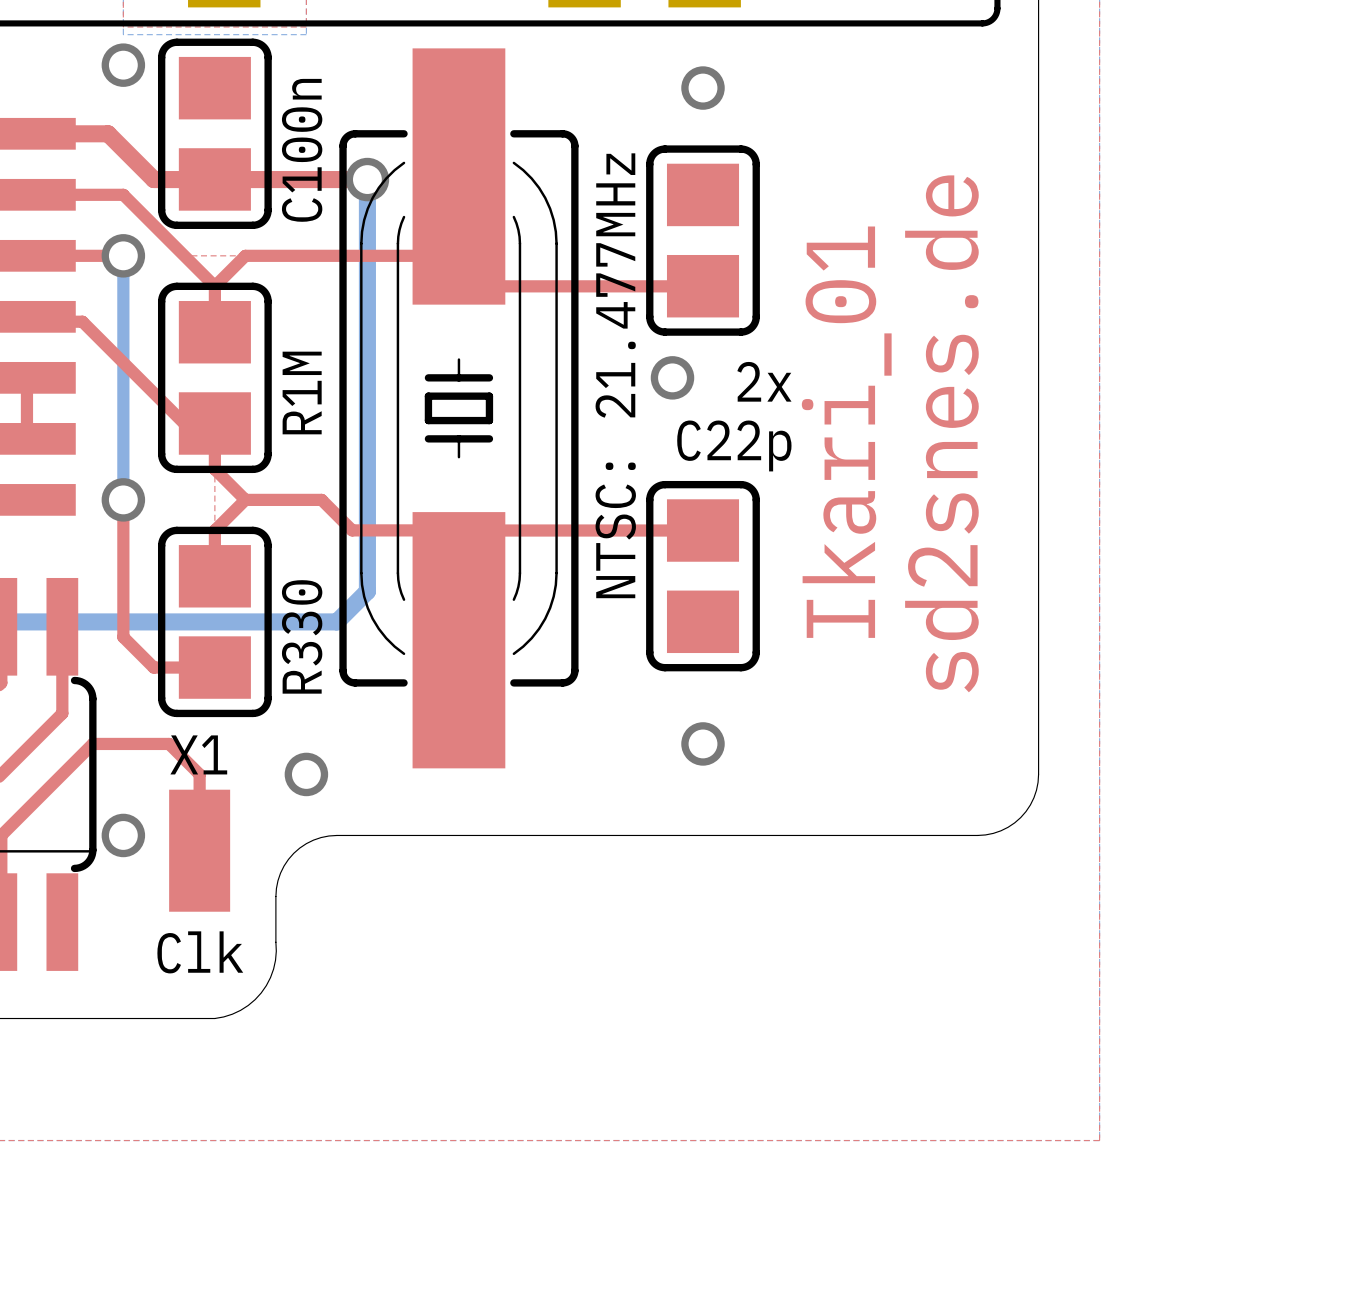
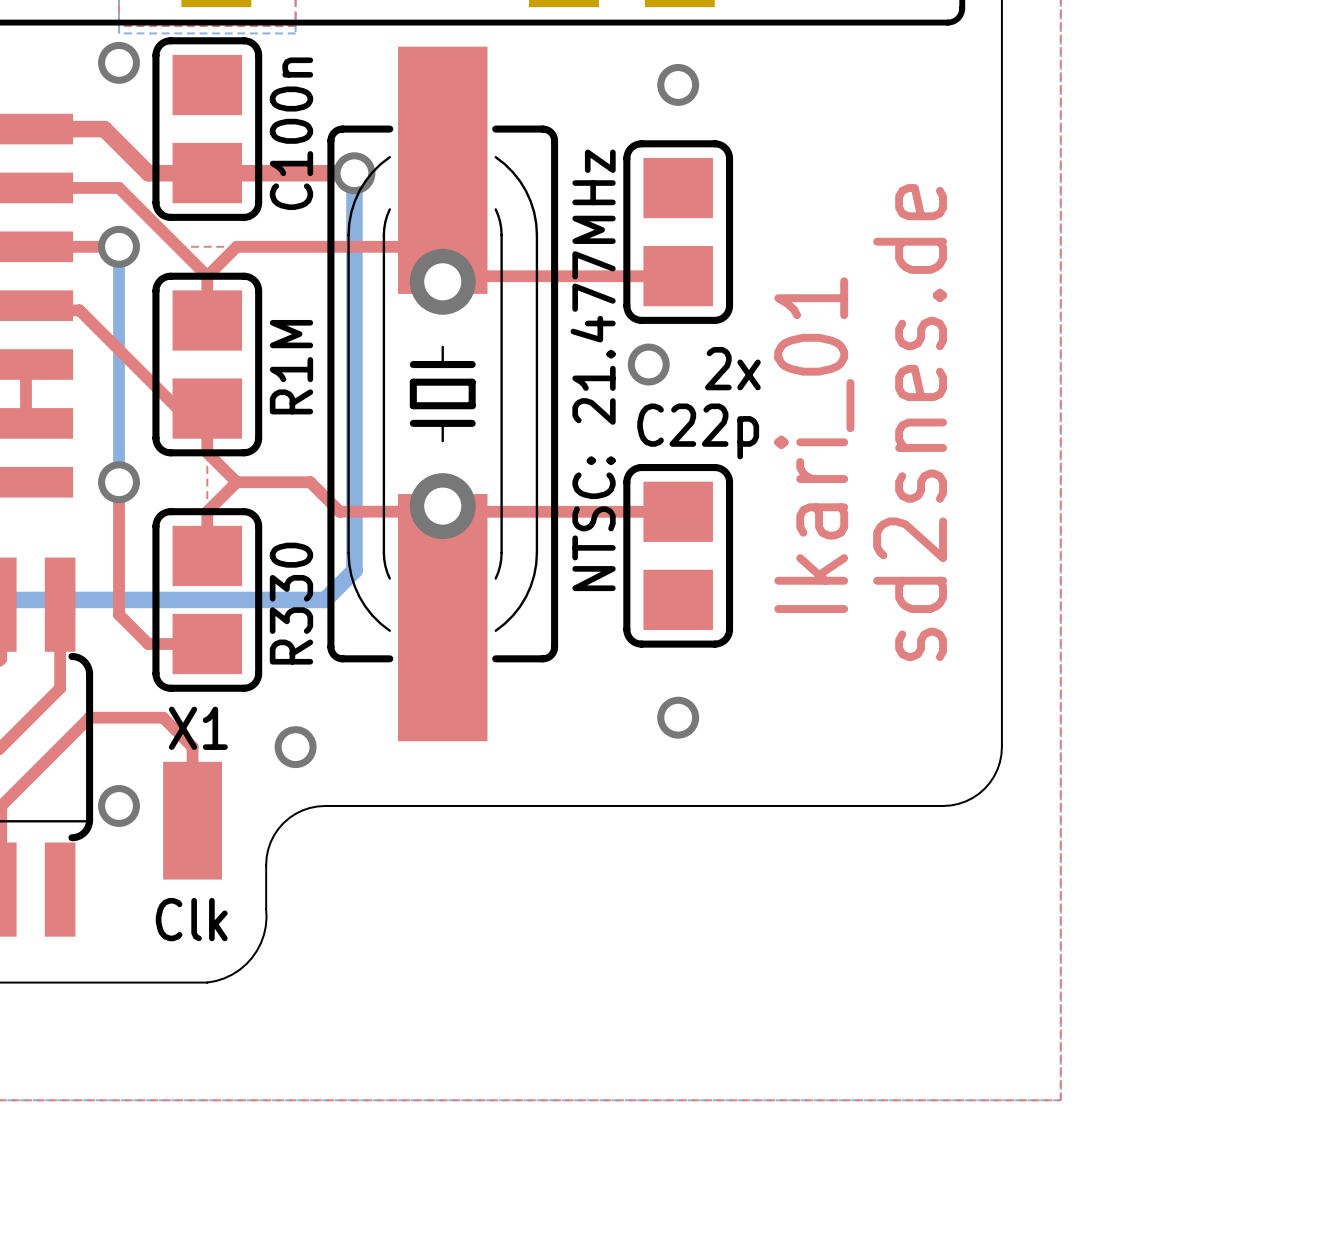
via: none -> (442, 281)
via: none -> (442, 506)

